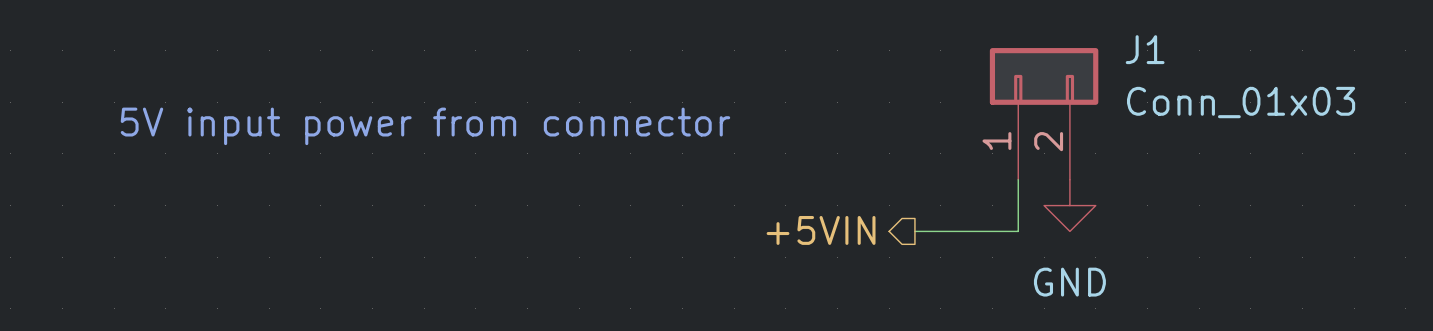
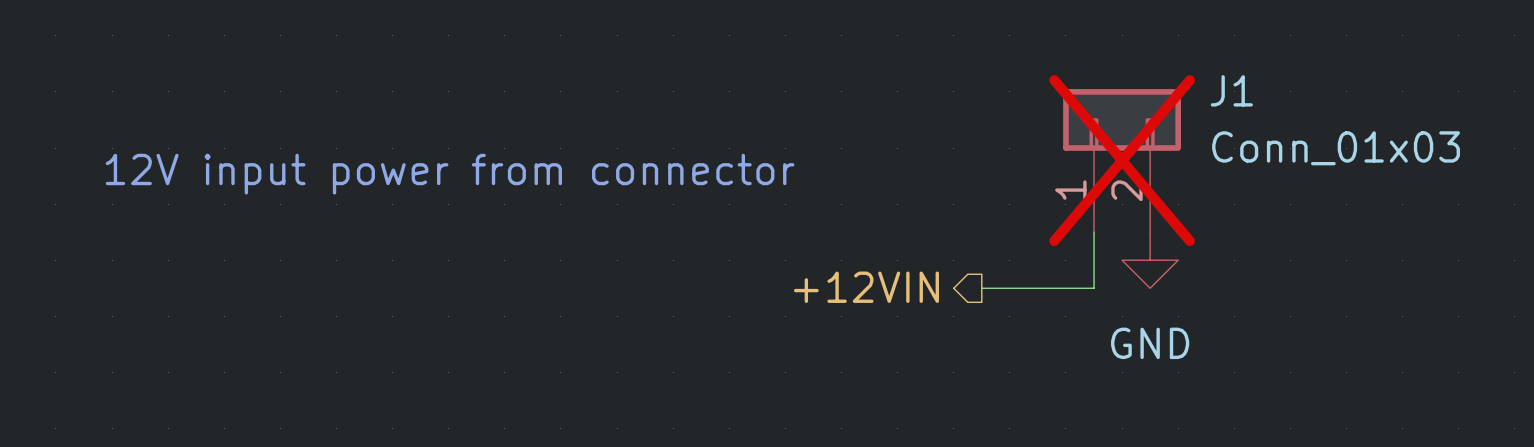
J1 do-not-place cross: none -> (1122, 160)
text: 5V input power from connector (425, 126) -> 12V input power from connector (450, 174)
hierarchical label: +5VIN (821, 230) -> +12VIN (866, 287)

